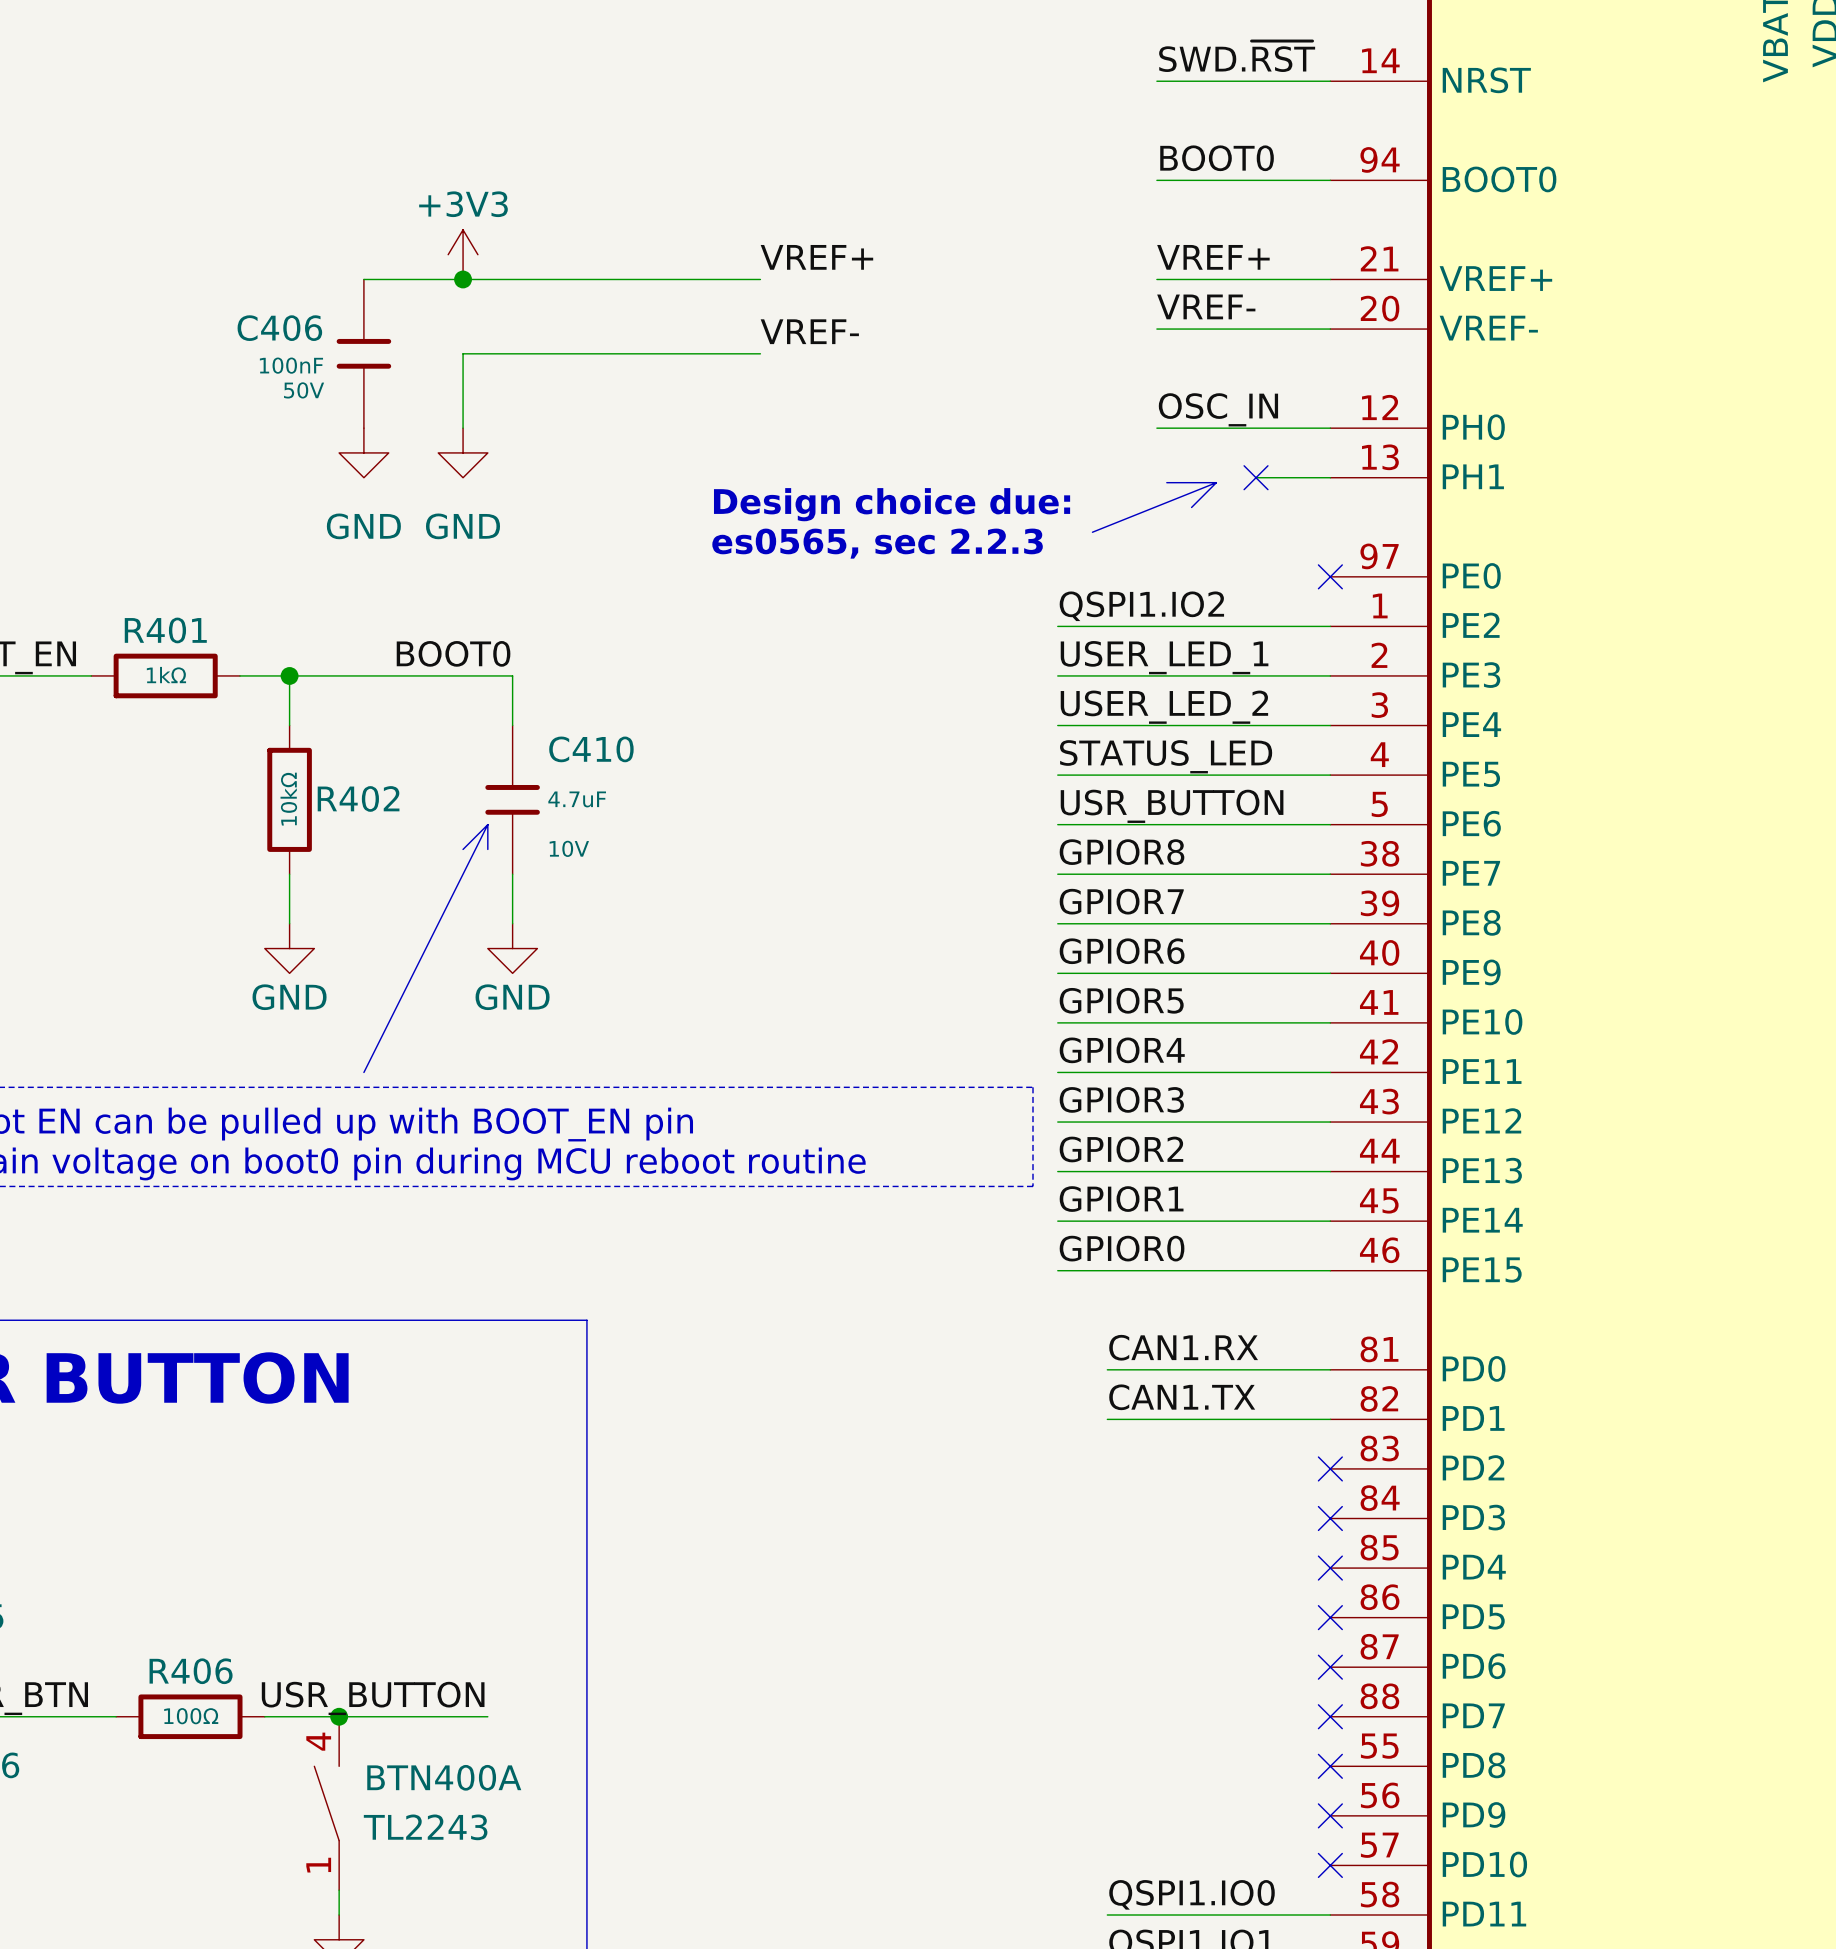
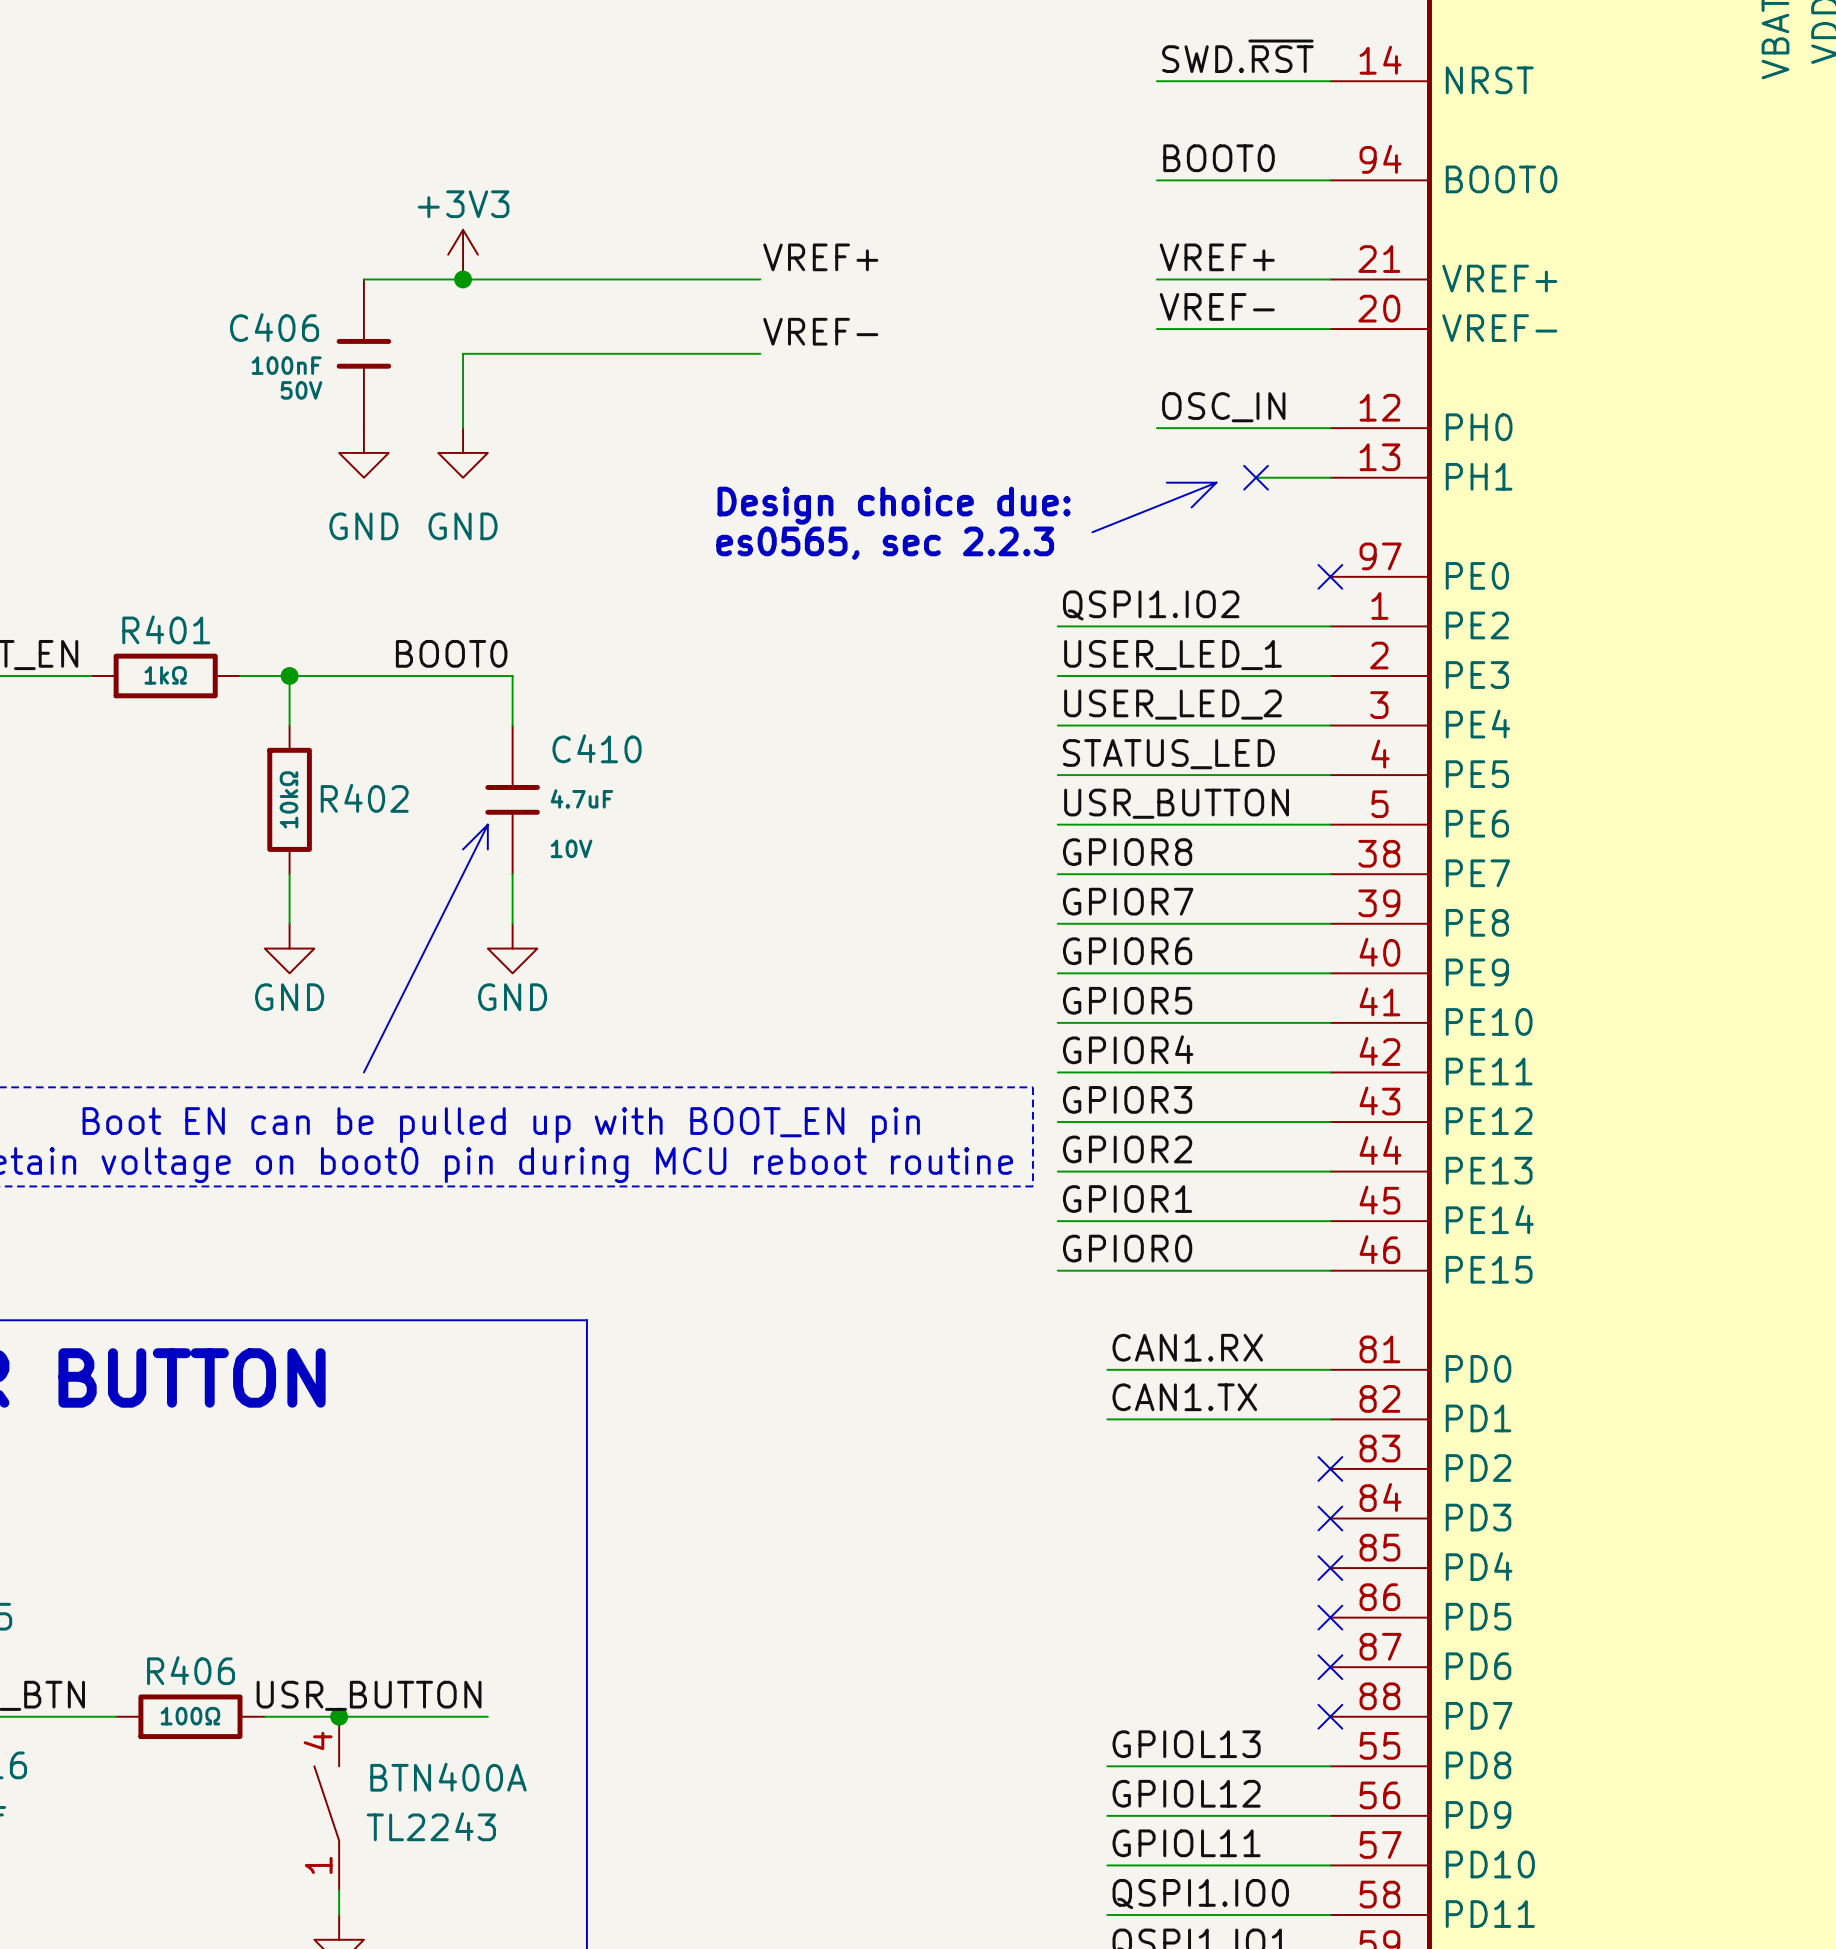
label: none -> GPIOL13 (1186, 1744)
wire: none -> (1107, 1766) (1330, 1766)
no-connect mark: (1330, 1766) -> none
label: none -> GPIOL12 (1186, 1793)
wire: none -> (1107, 1815) (1330, 1815)
no-connect mark: (1330, 1815) -> none
label: none -> GPIOL11 (1186, 1843)
wire: none -> (1107, 1865) (1330, 1865)
no-connect mark: (1330, 1865) -> none

